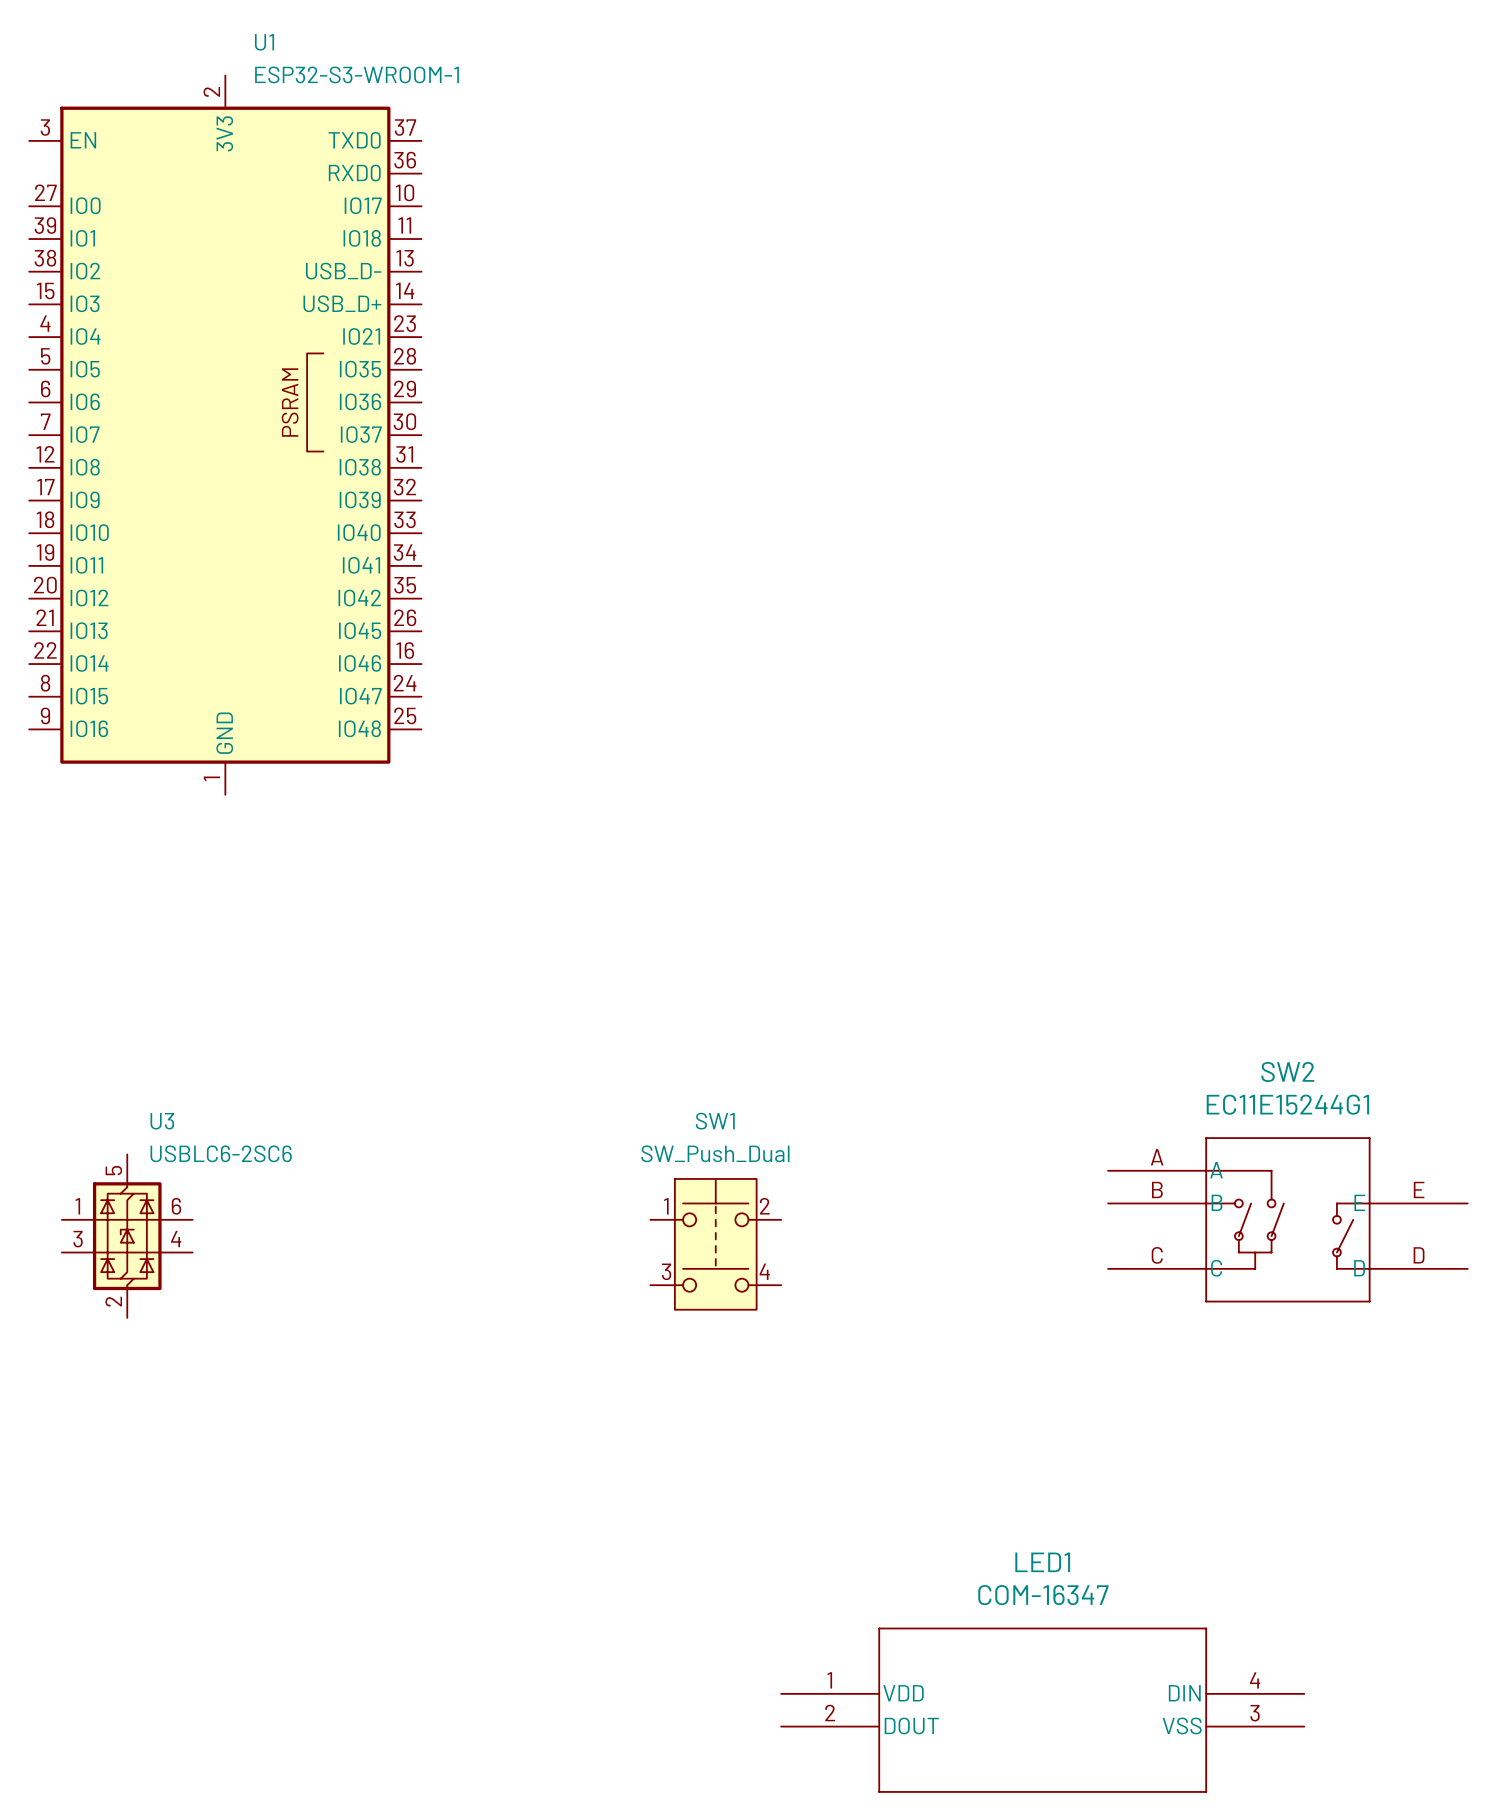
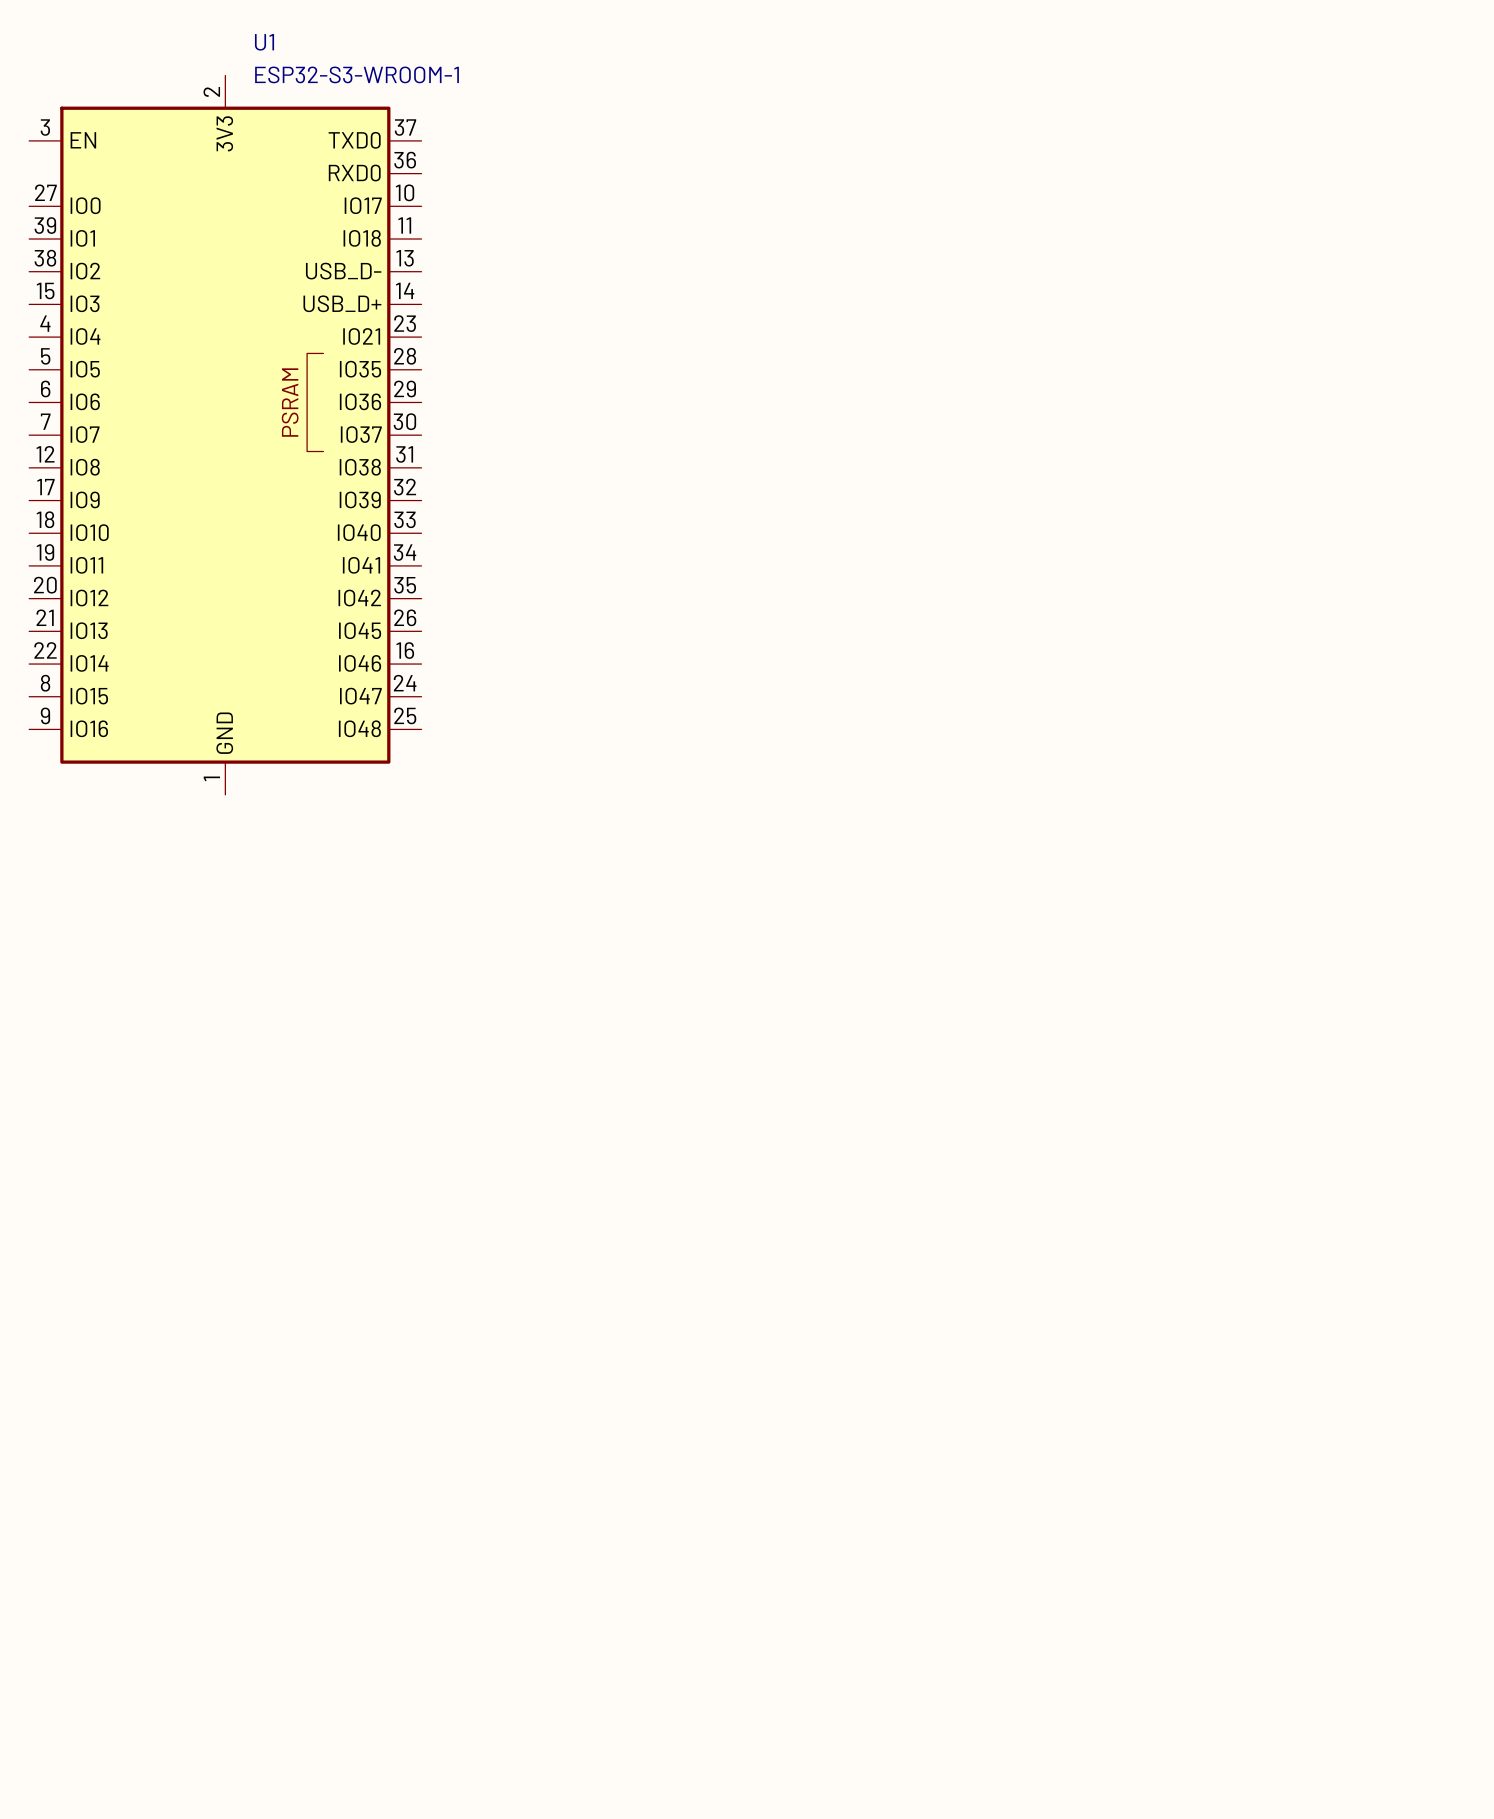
SW2: EC11E15244G1 (1287, 1219) -> none
U3: USBLC6-2SC6 (127, 1236) -> none
SW1: SW_Push_Dual (715, 1244) -> none
LED1: COM-16347 (1042, 1710) -> none

